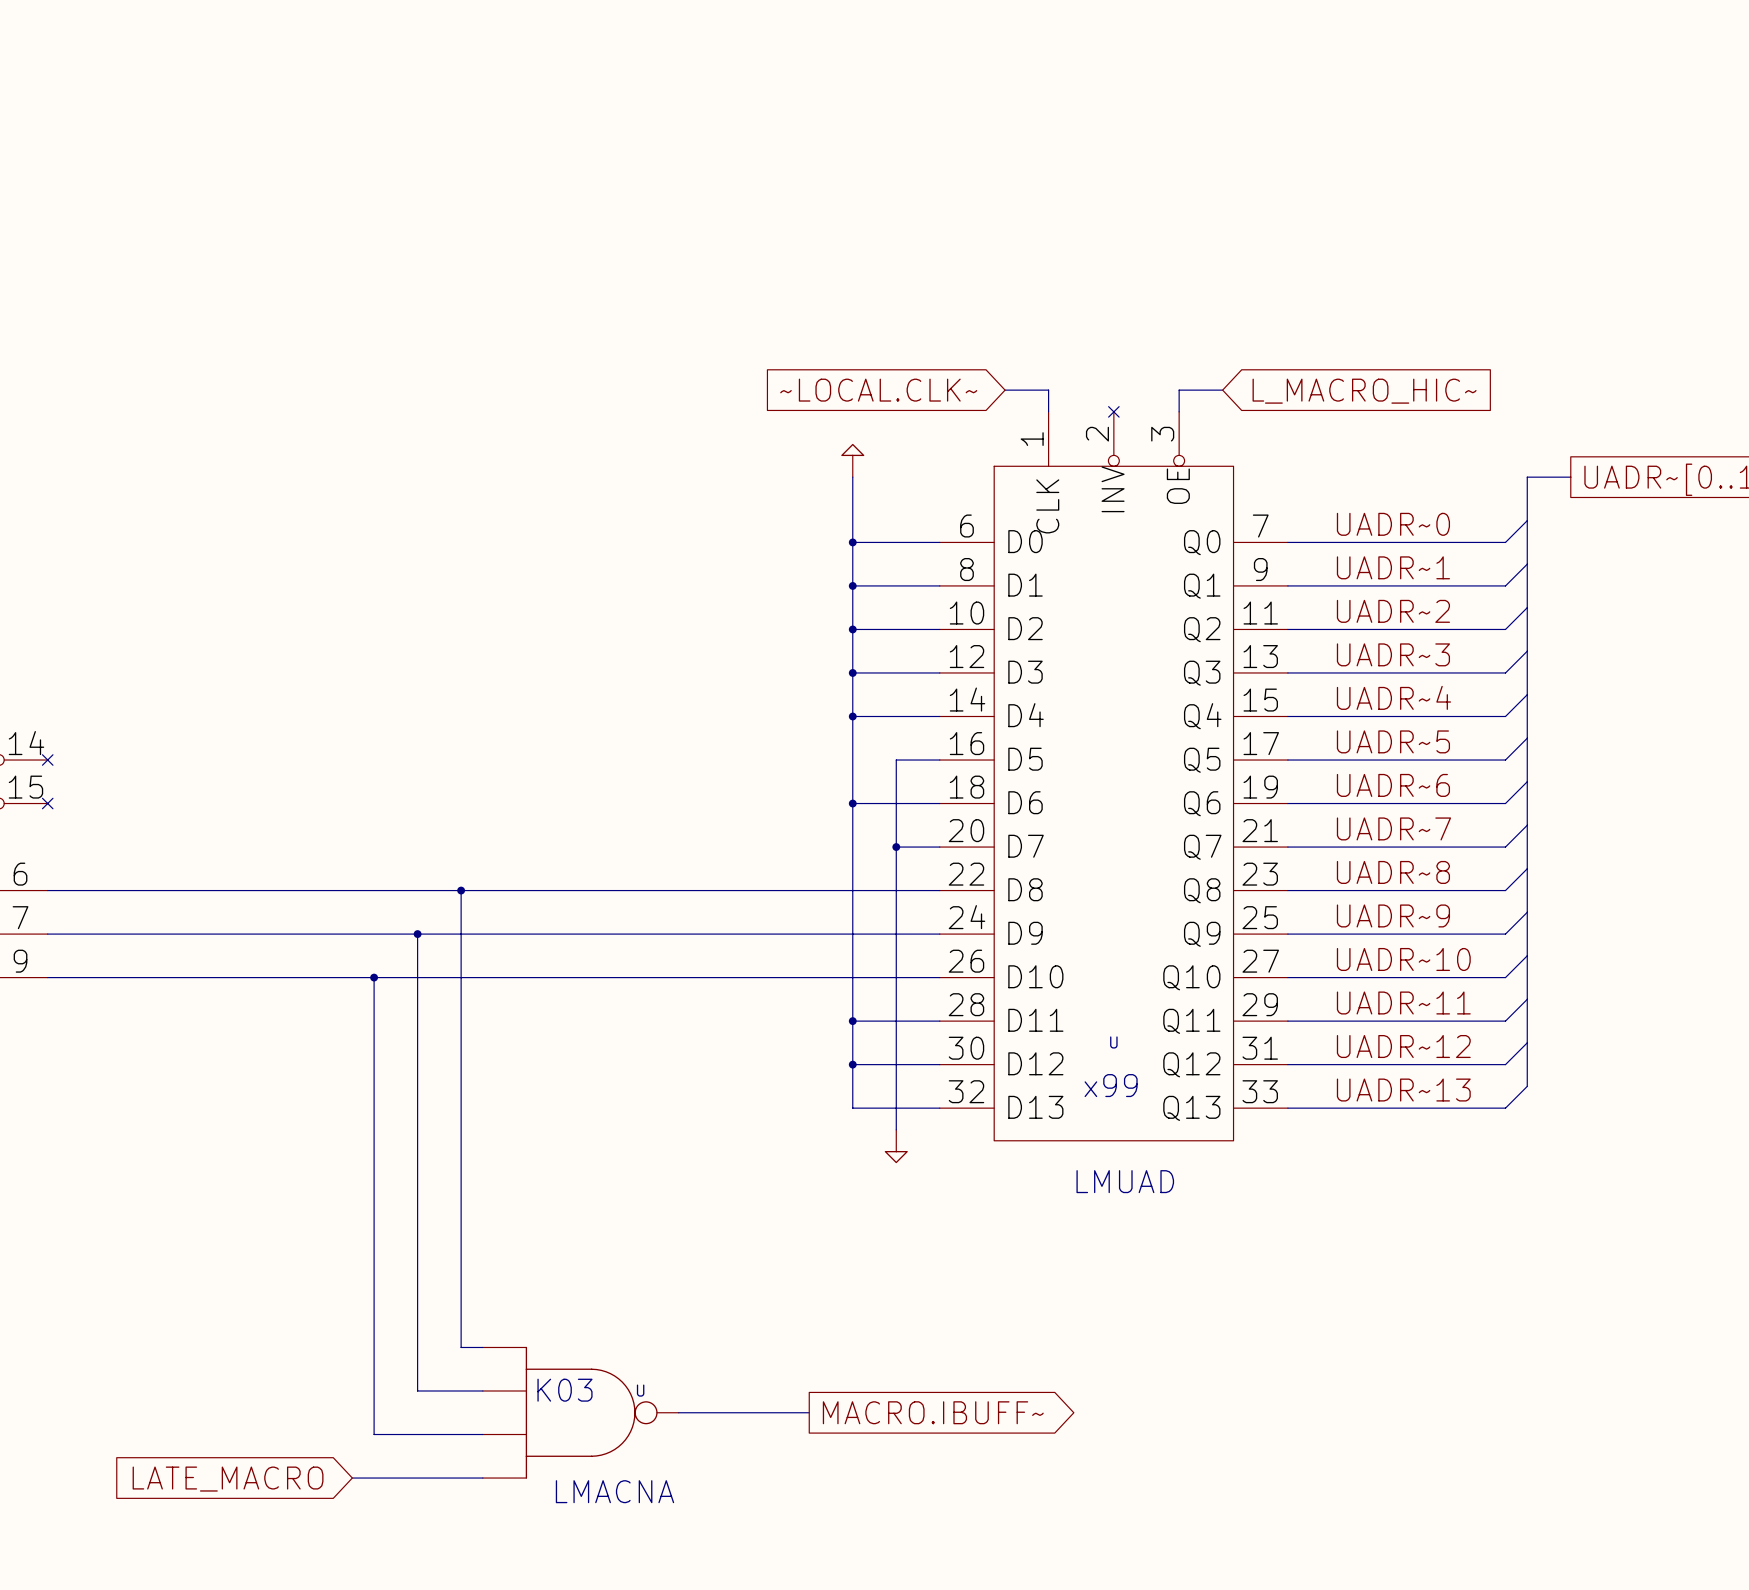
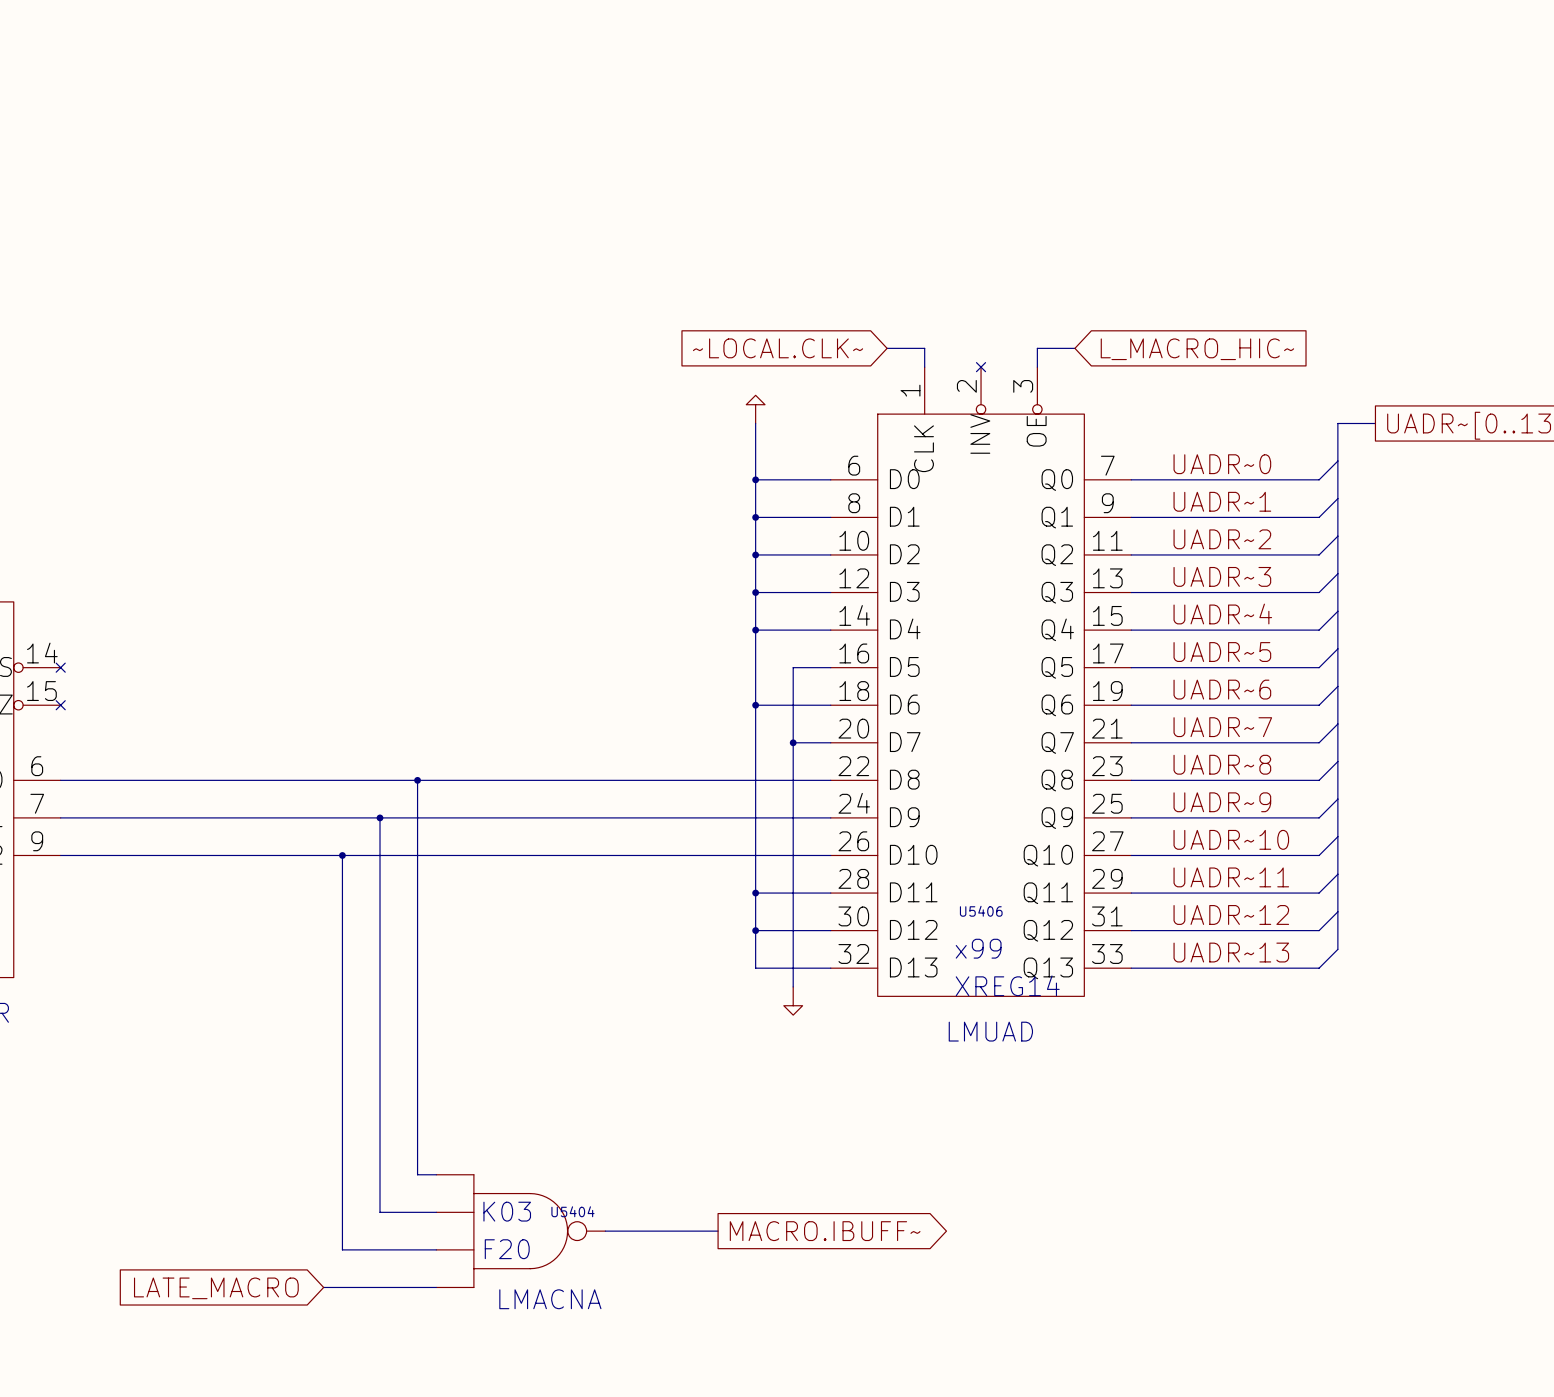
U name: U (1113, 1042) -> U5406 (981, 911)
U value: none -> XREG14 (1007, 985)
U name: U (640, 1390) -> U5404 (572, 1211)
U value: none -> F20 (507, 1249)

